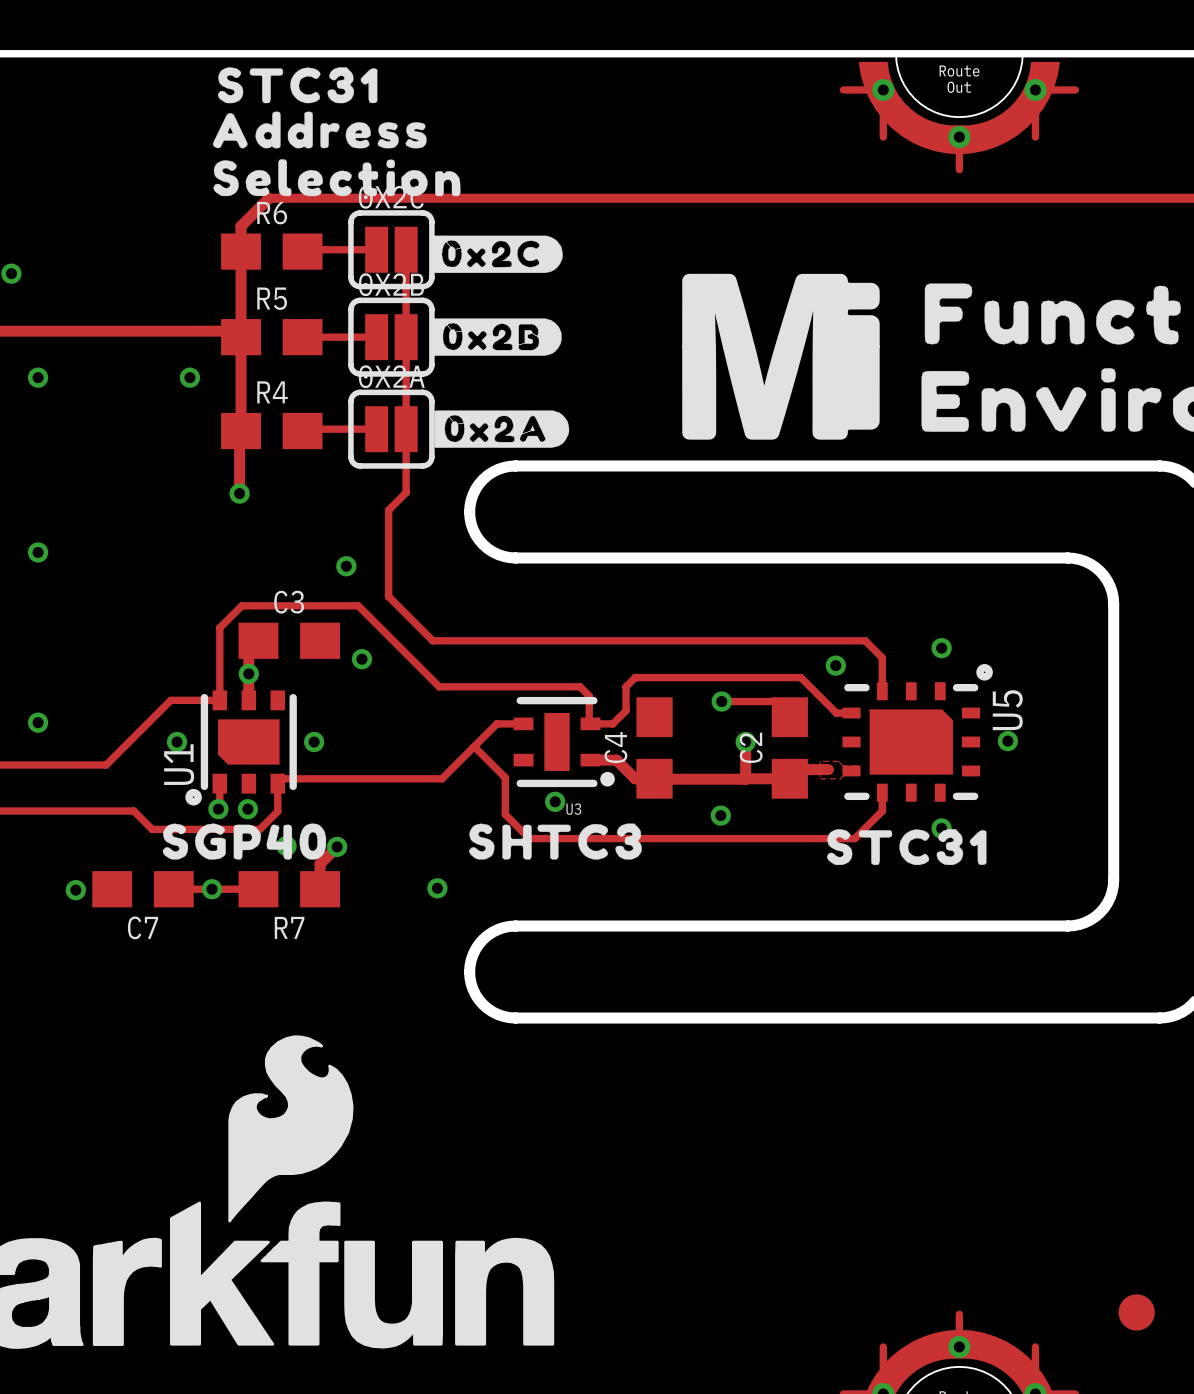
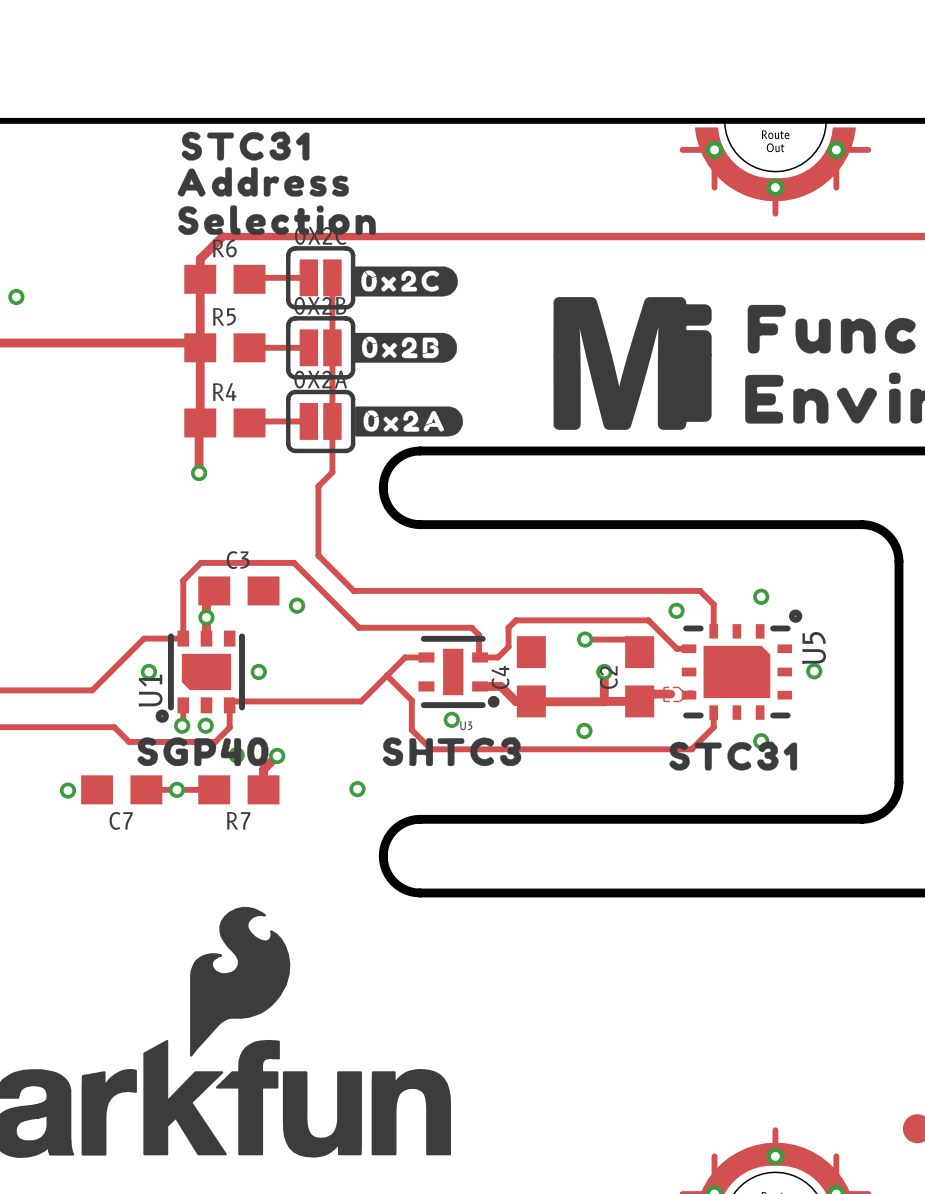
via: (38, 377) -> none
via: (189, 377) -> none
via: (38, 552) -> none
via: (346, 566) -> none
via: (38, 722) -> none

